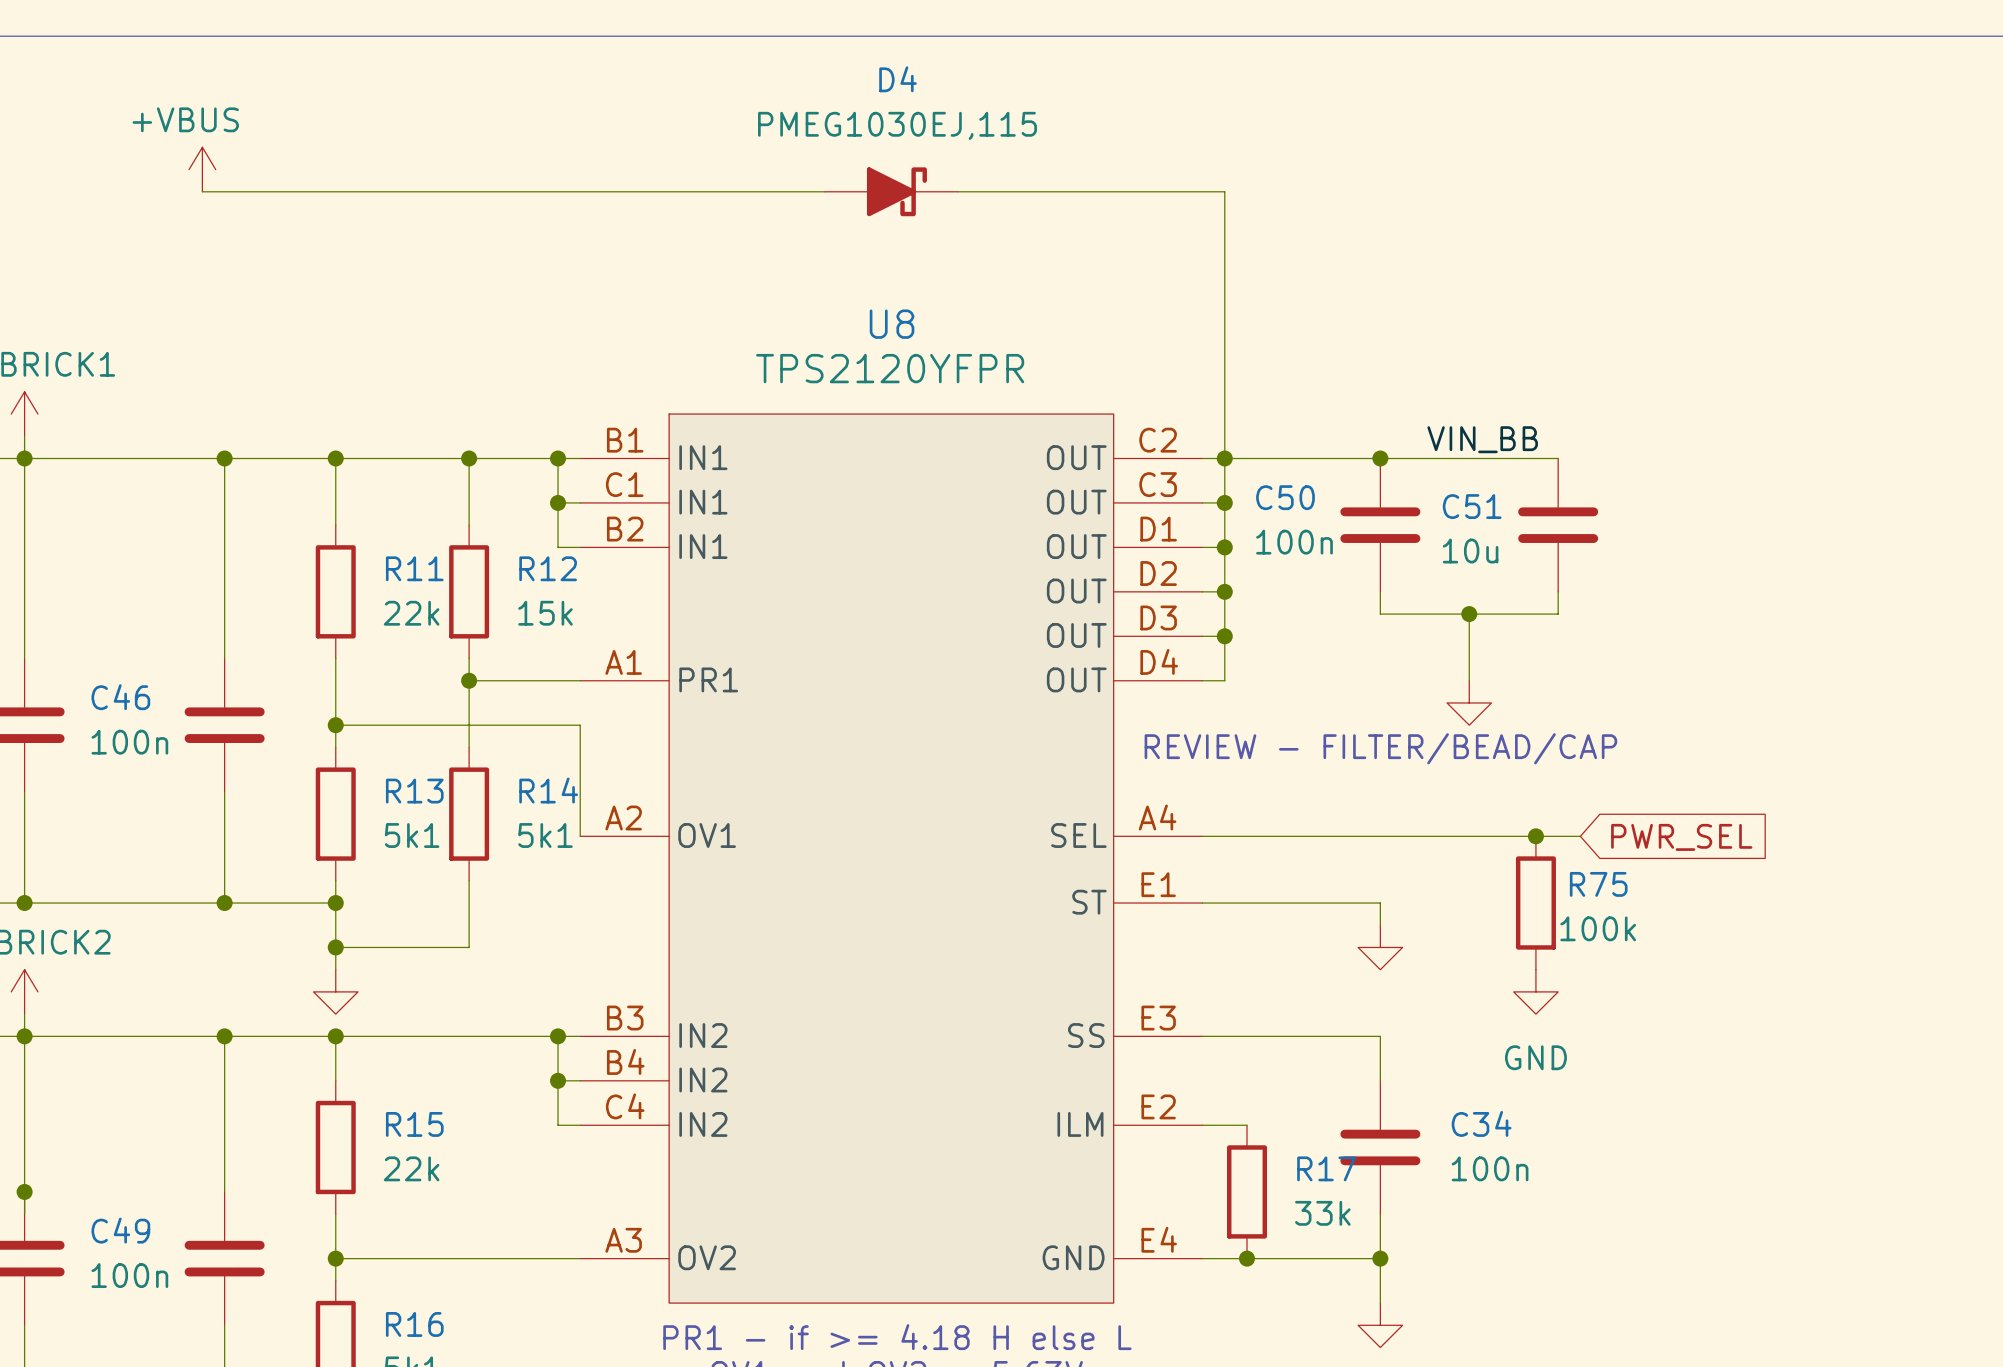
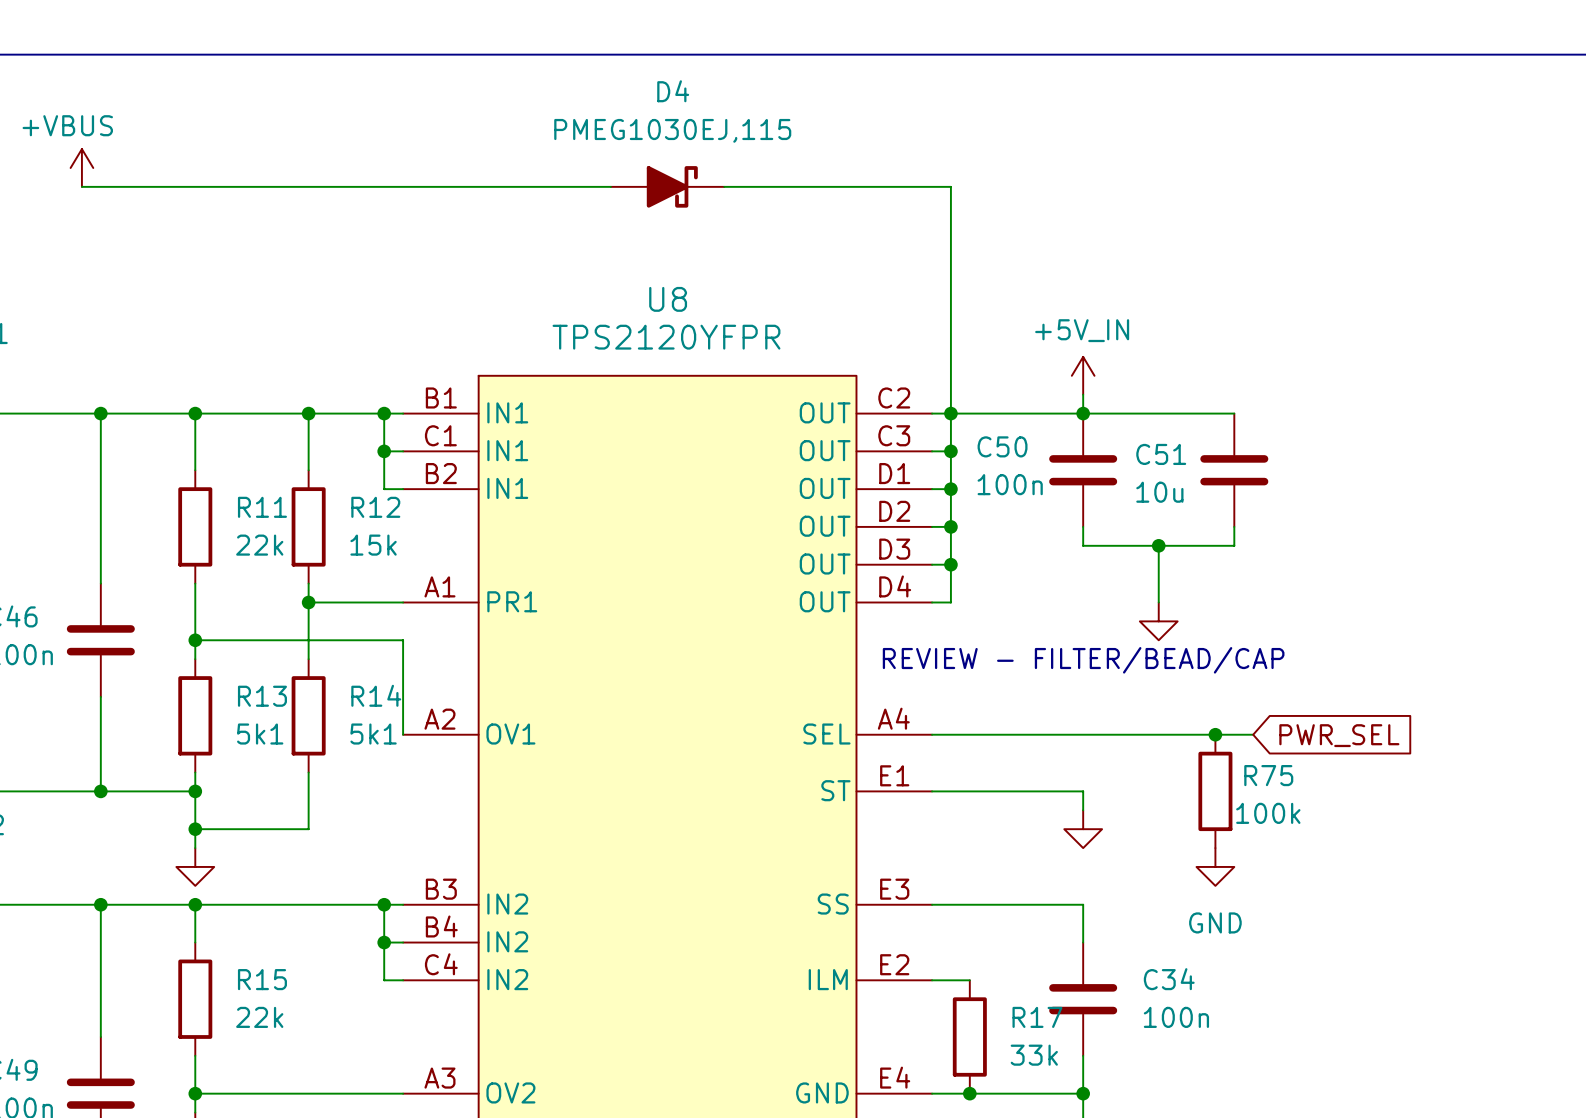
power symbol: none -> +5V_IN (1083, 375)
wire: none -> (1083, 394) (1083, 413)
label: VIN_BB (1482, 439) -> none

